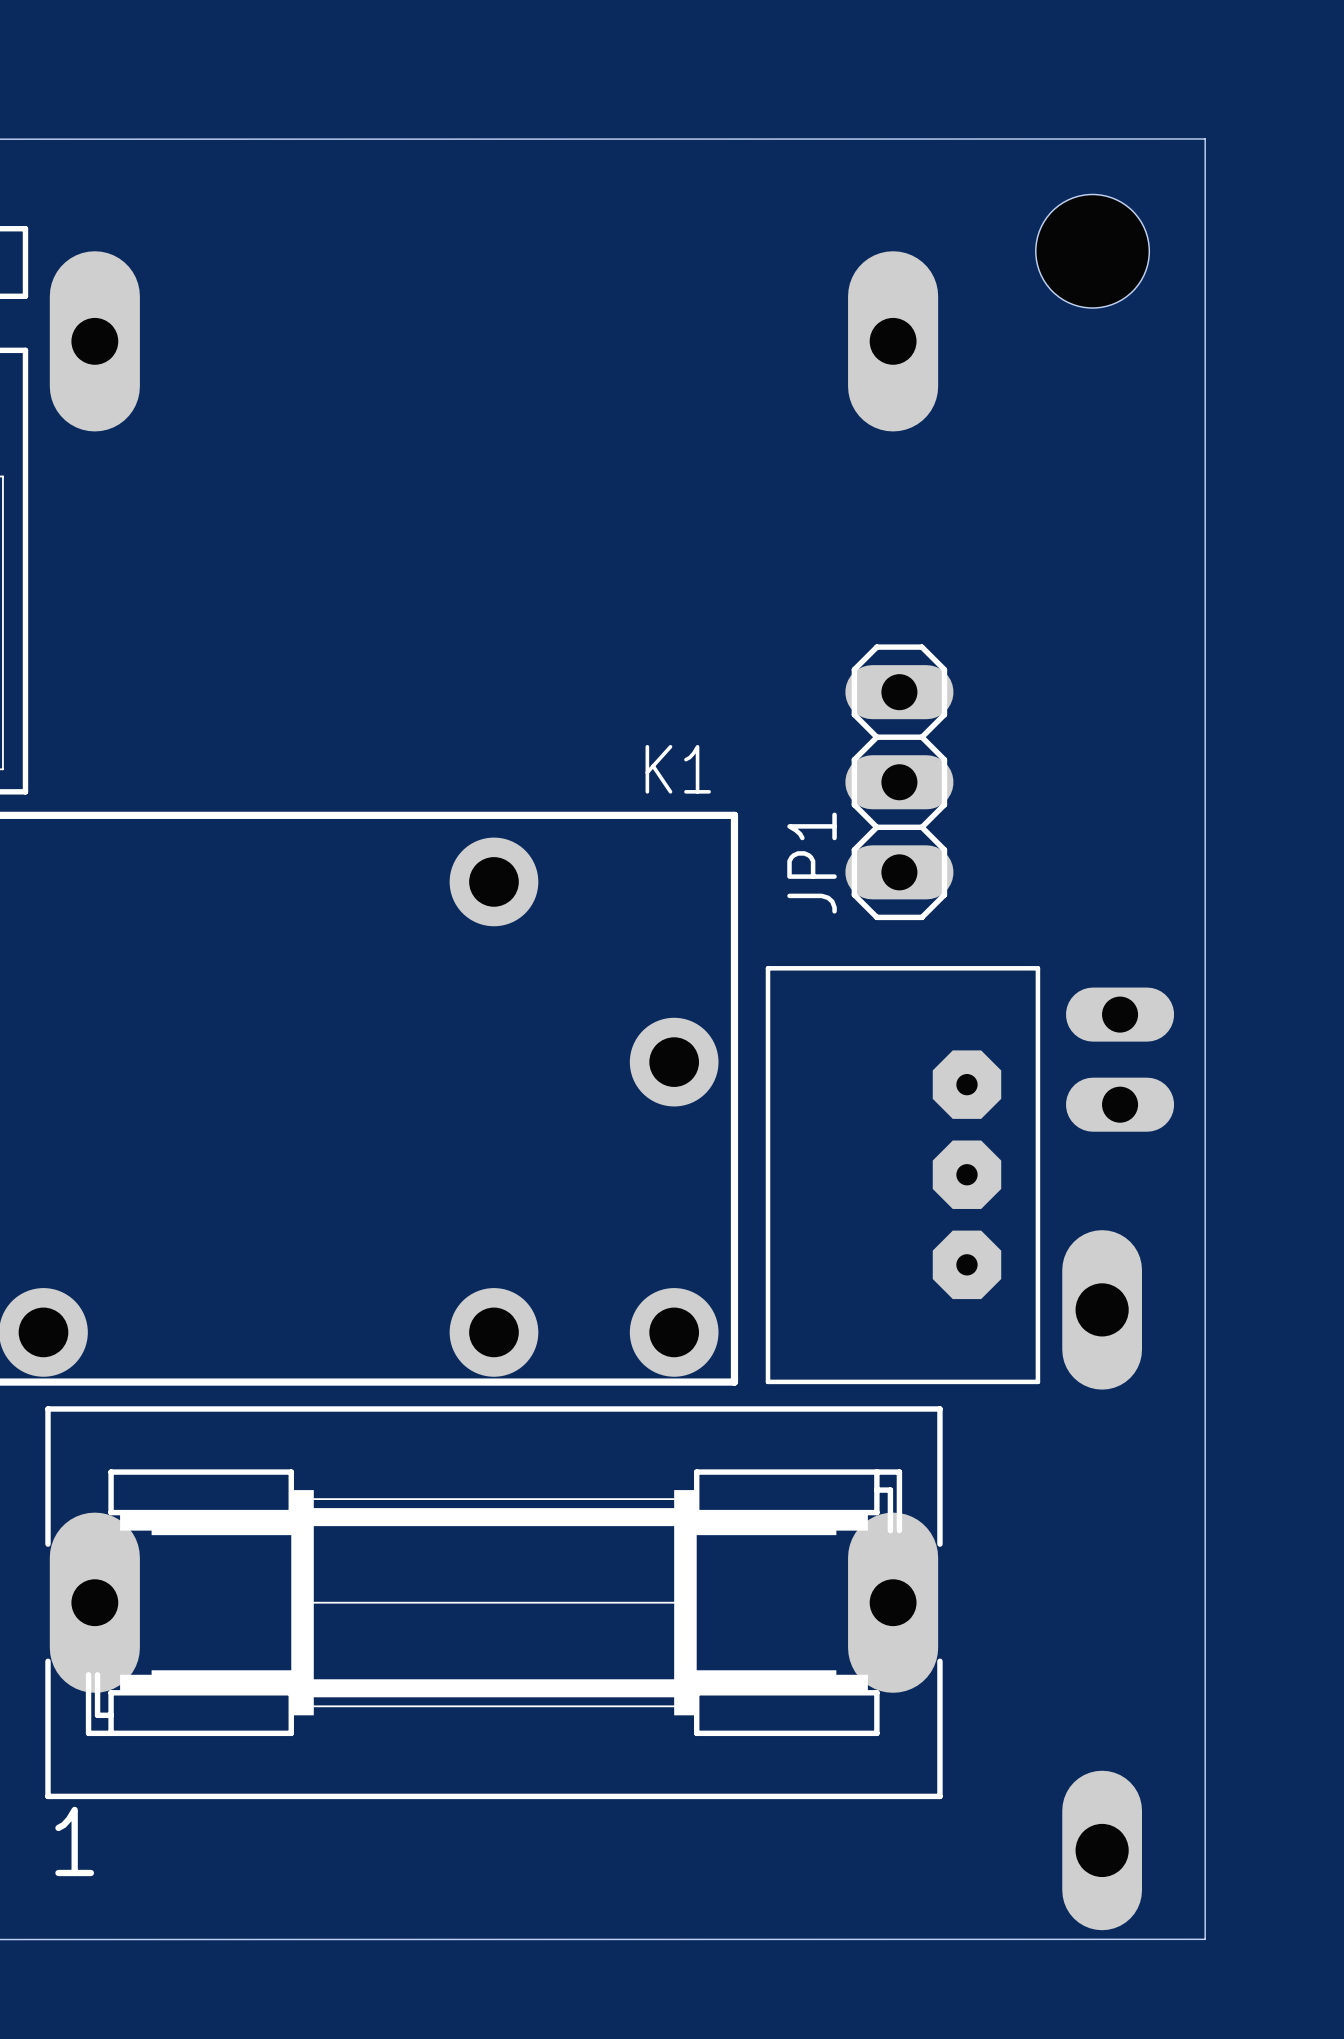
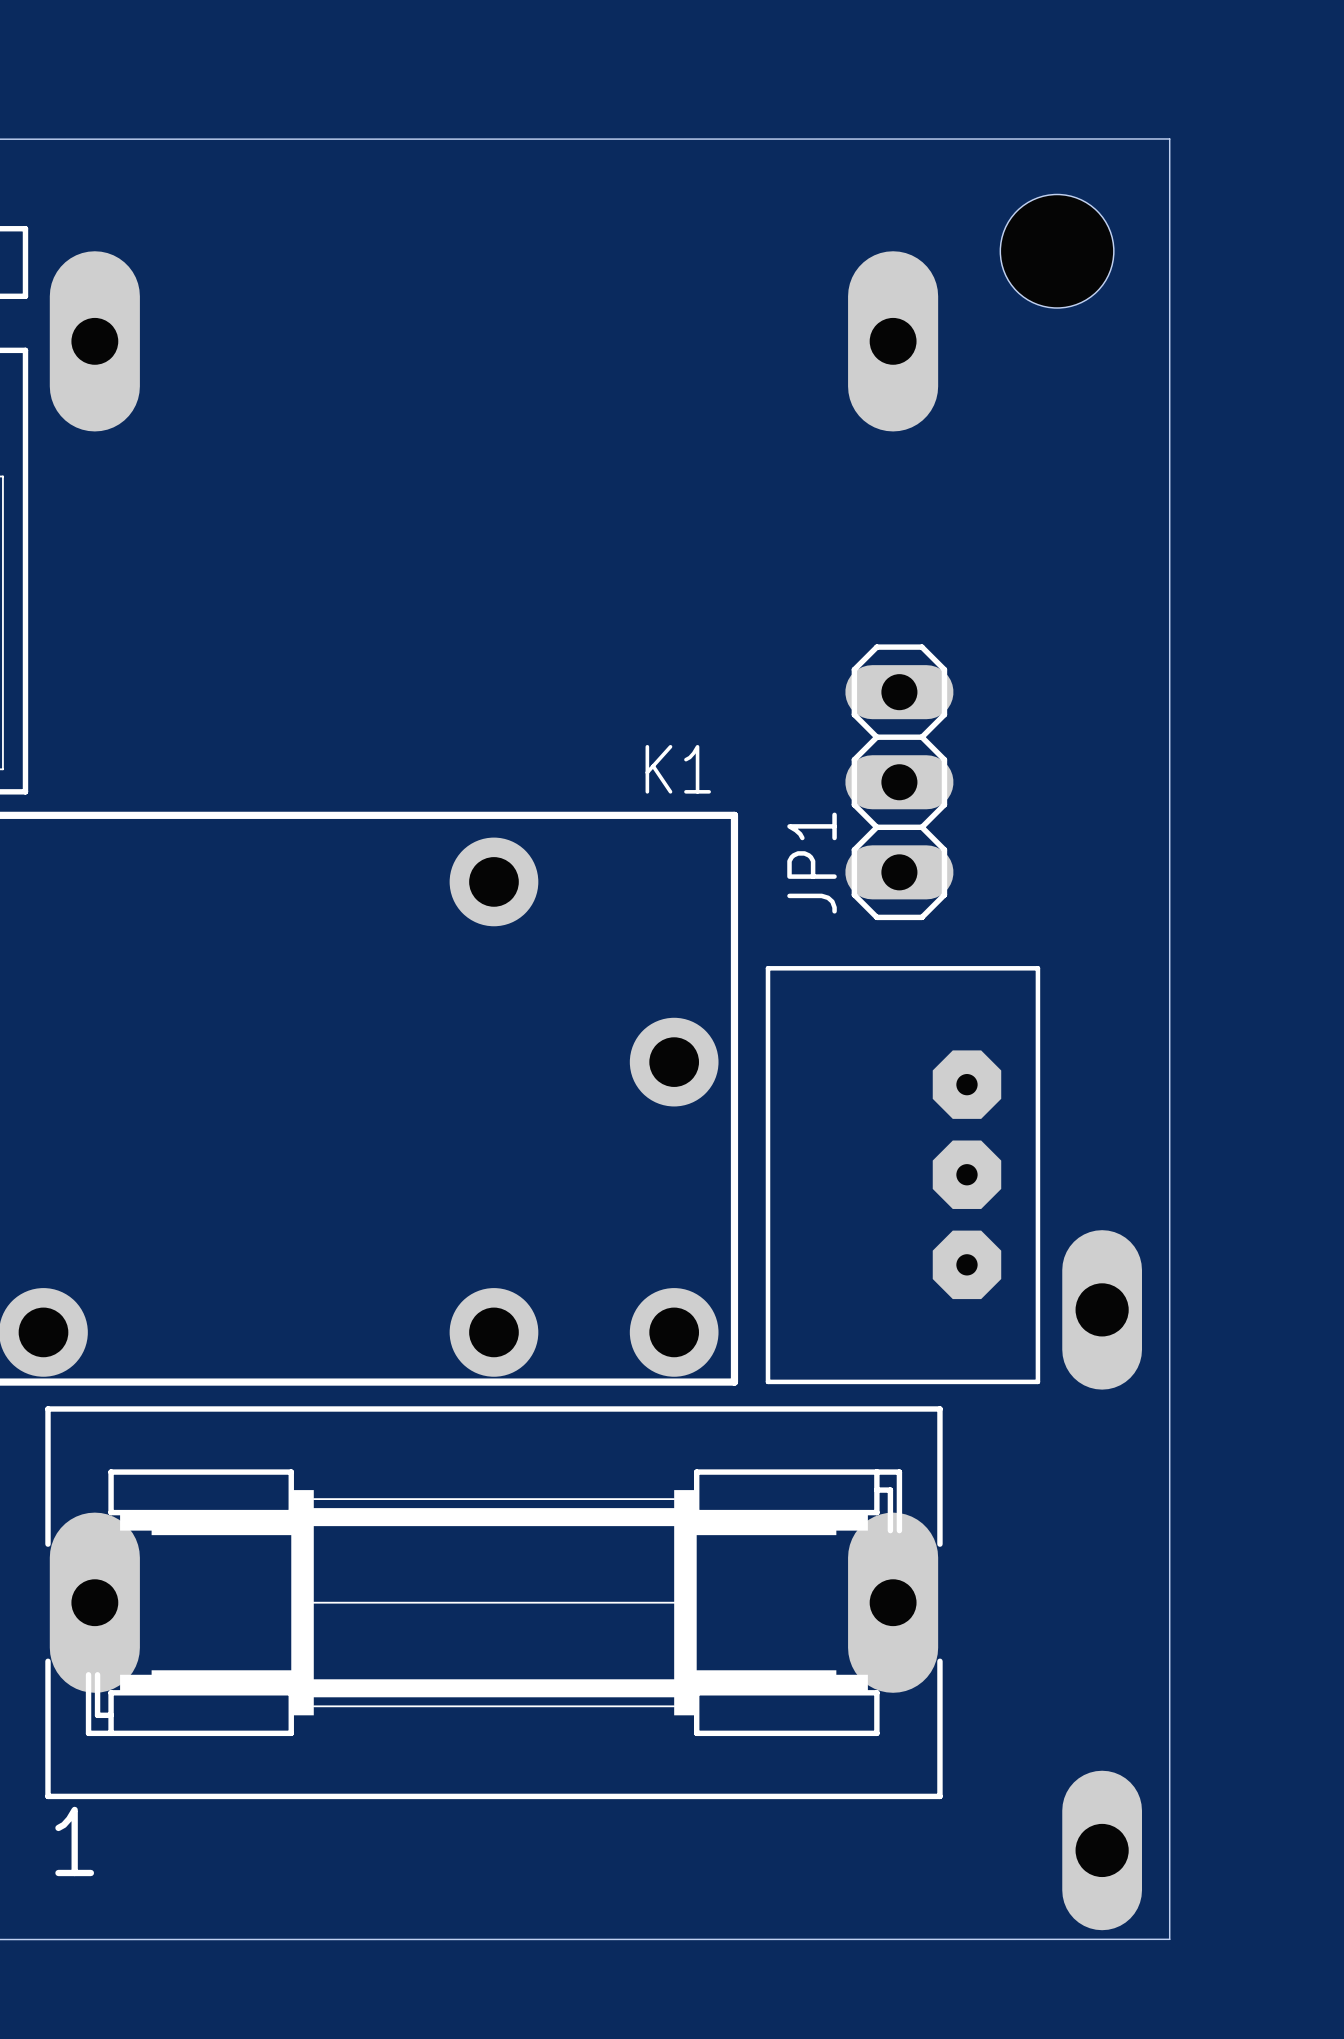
board edge: (1169, 138) (1205, 138) (1205, 1939) (1169, 1939) -> (1169, 138) (1169, 1939)
hole position: (1092, 251) -> (1057, 251)
part: (1120, 1059) -> none

